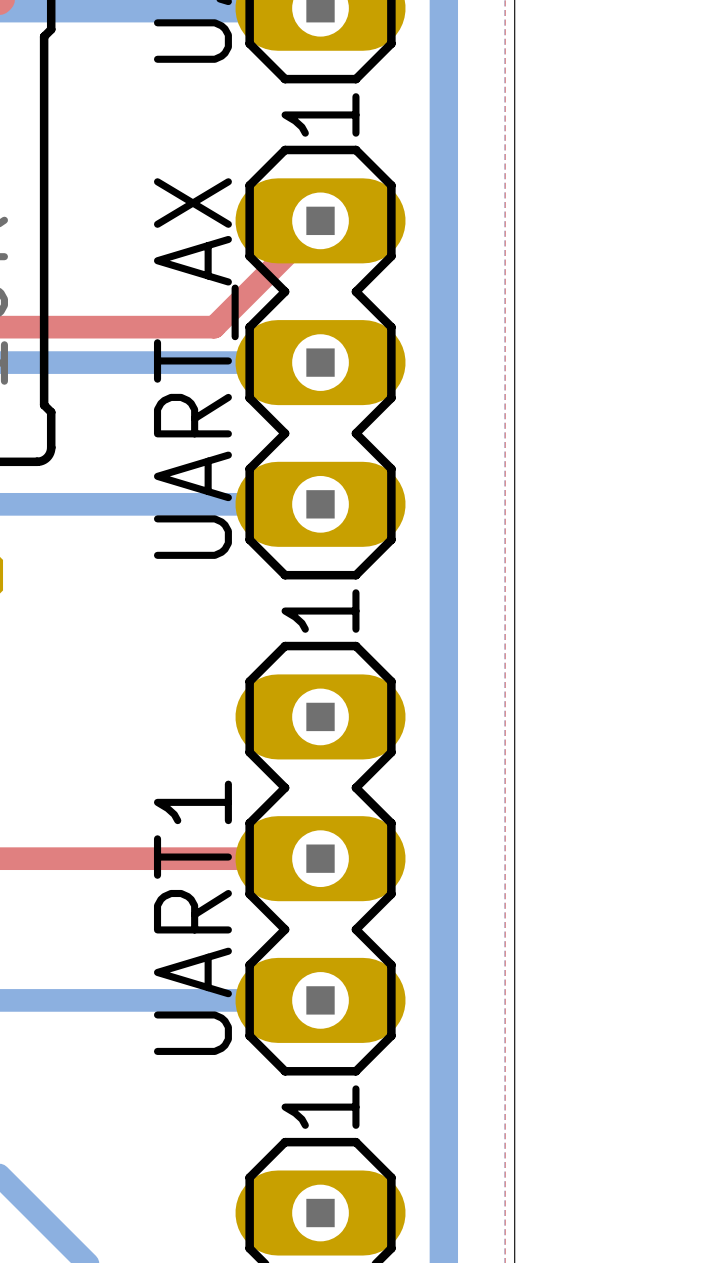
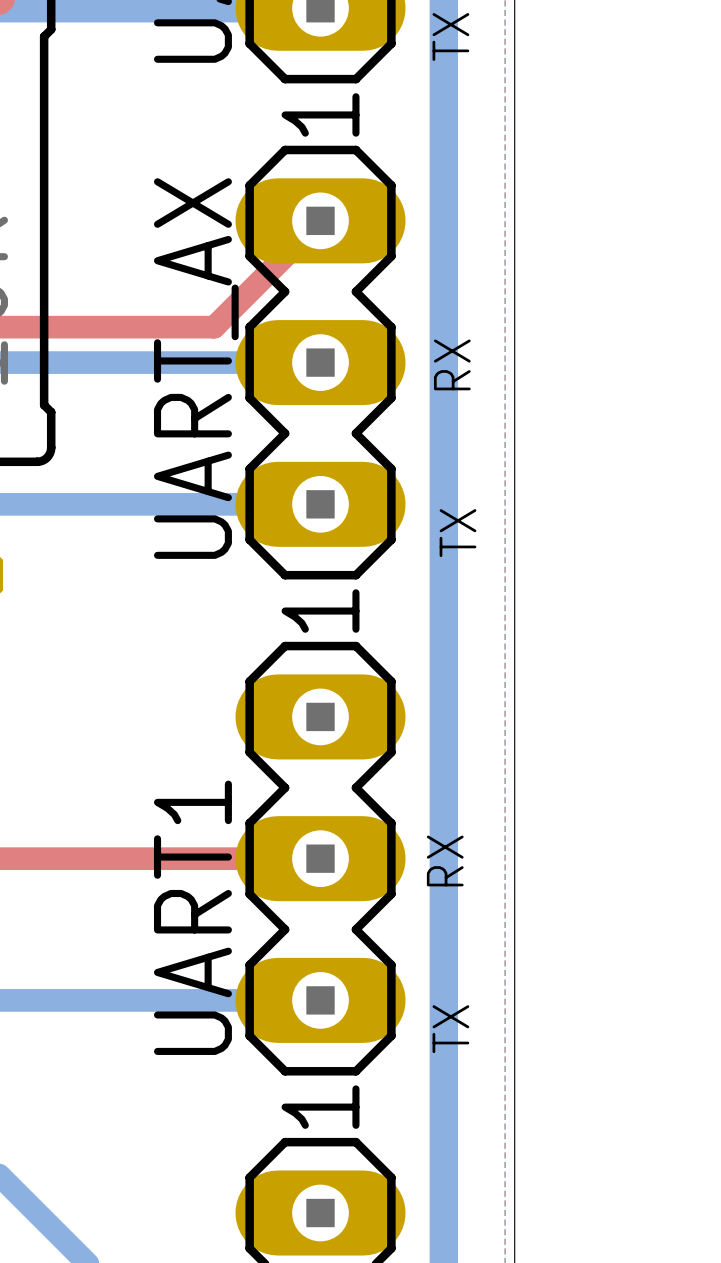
text: none -> TX (450, 37)
text: none -> RX (452, 364)
text: none -> TX (458, 533)
text: none -> RX (445, 860)
text: none -> TX (450, 1029)

